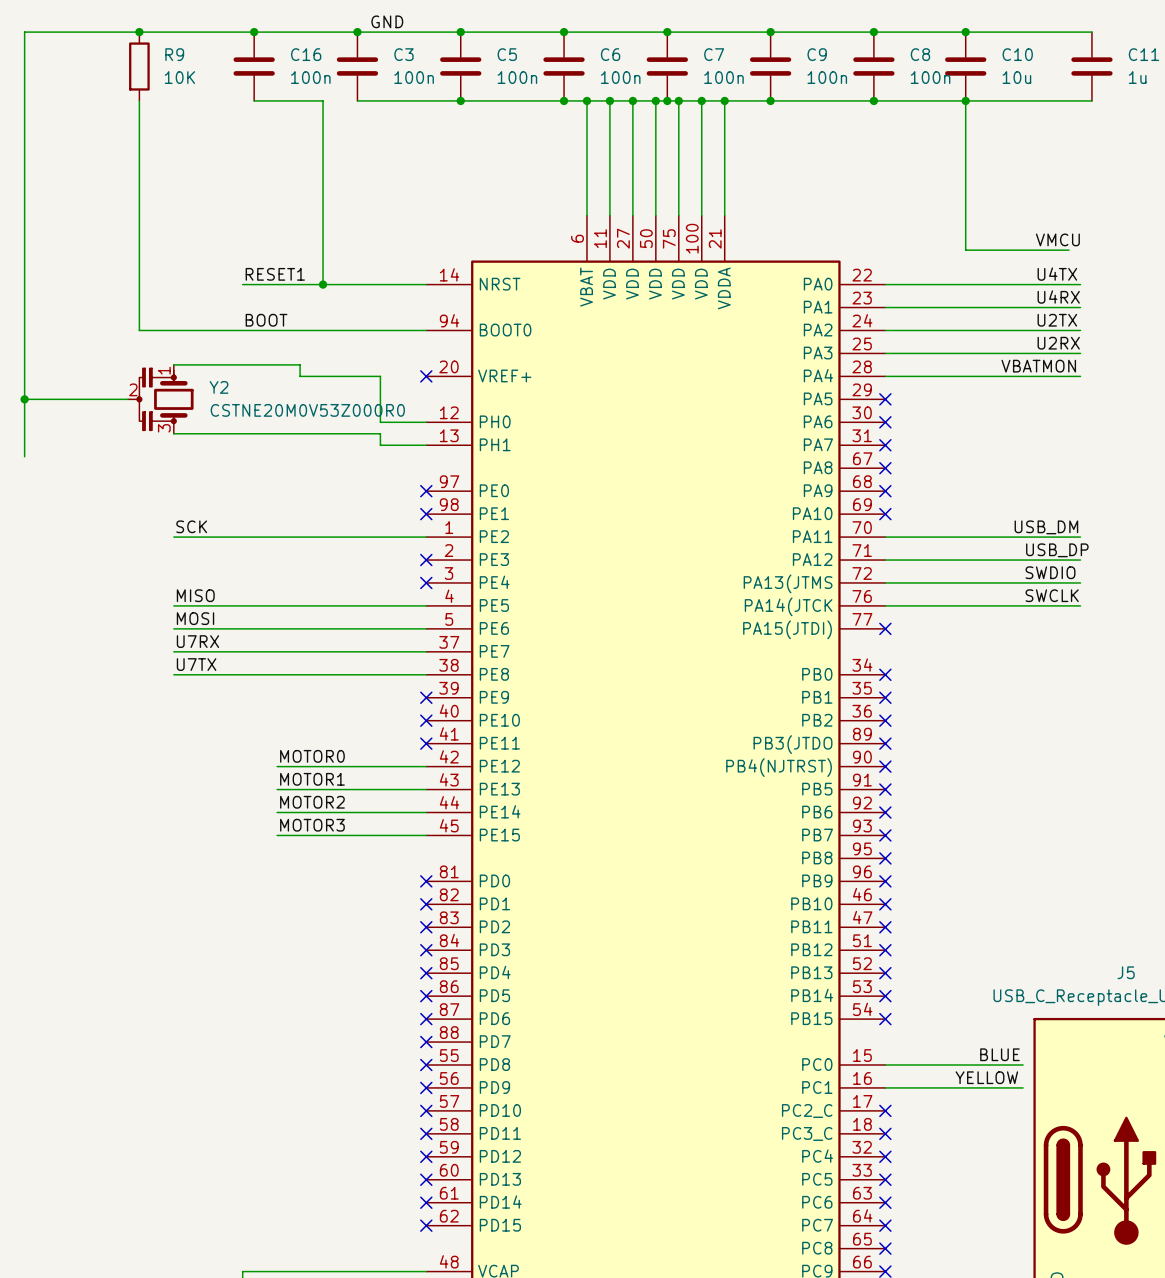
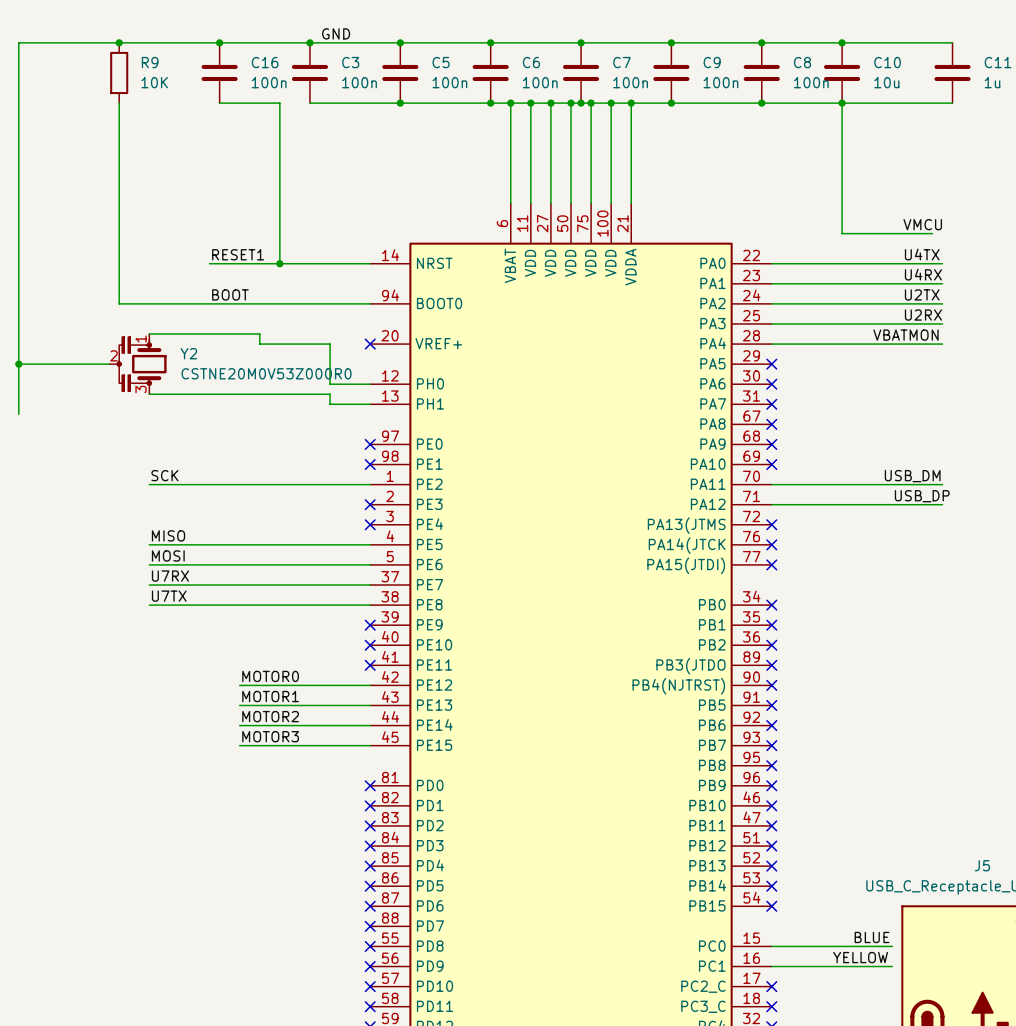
label: SWDIO (1050, 572) -> none
wire: (885, 582) (1080, 582) -> none
no-connect mark: none -> (771, 524)
label: SWCLK (1052, 595) -> none
wire: (885, 605) (1080, 605) -> none
no-connect mark: none -> (771, 544)

